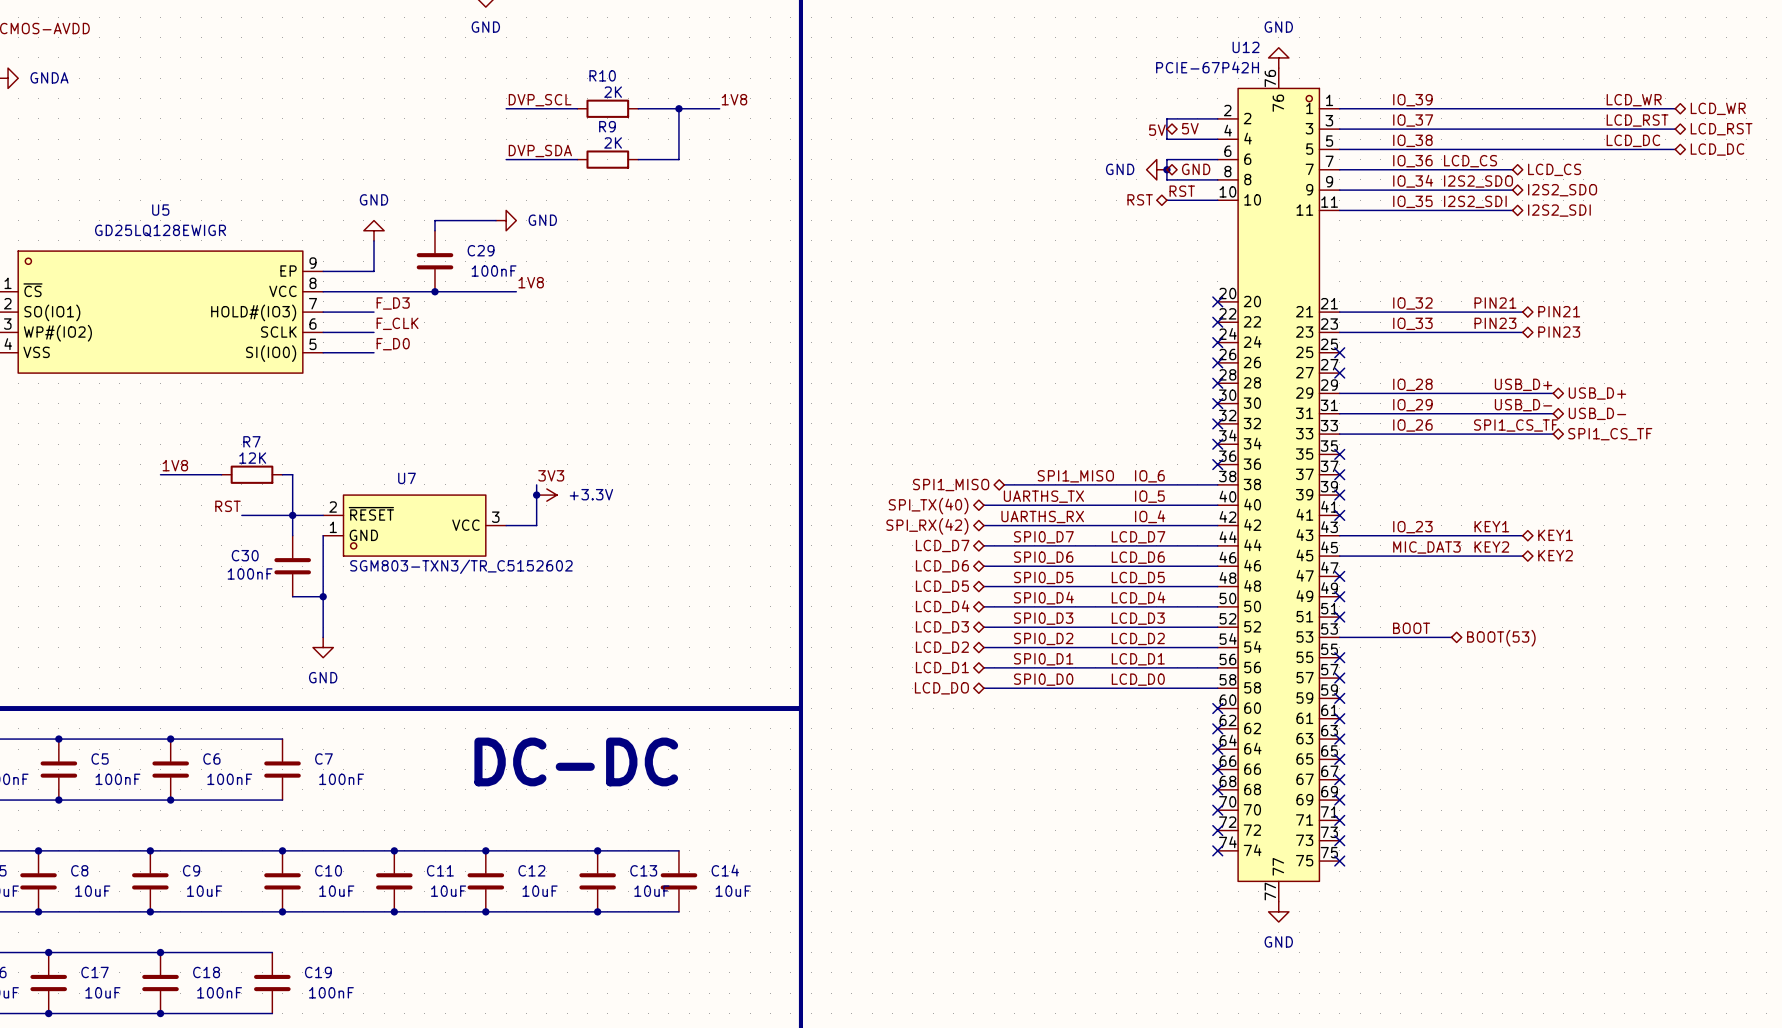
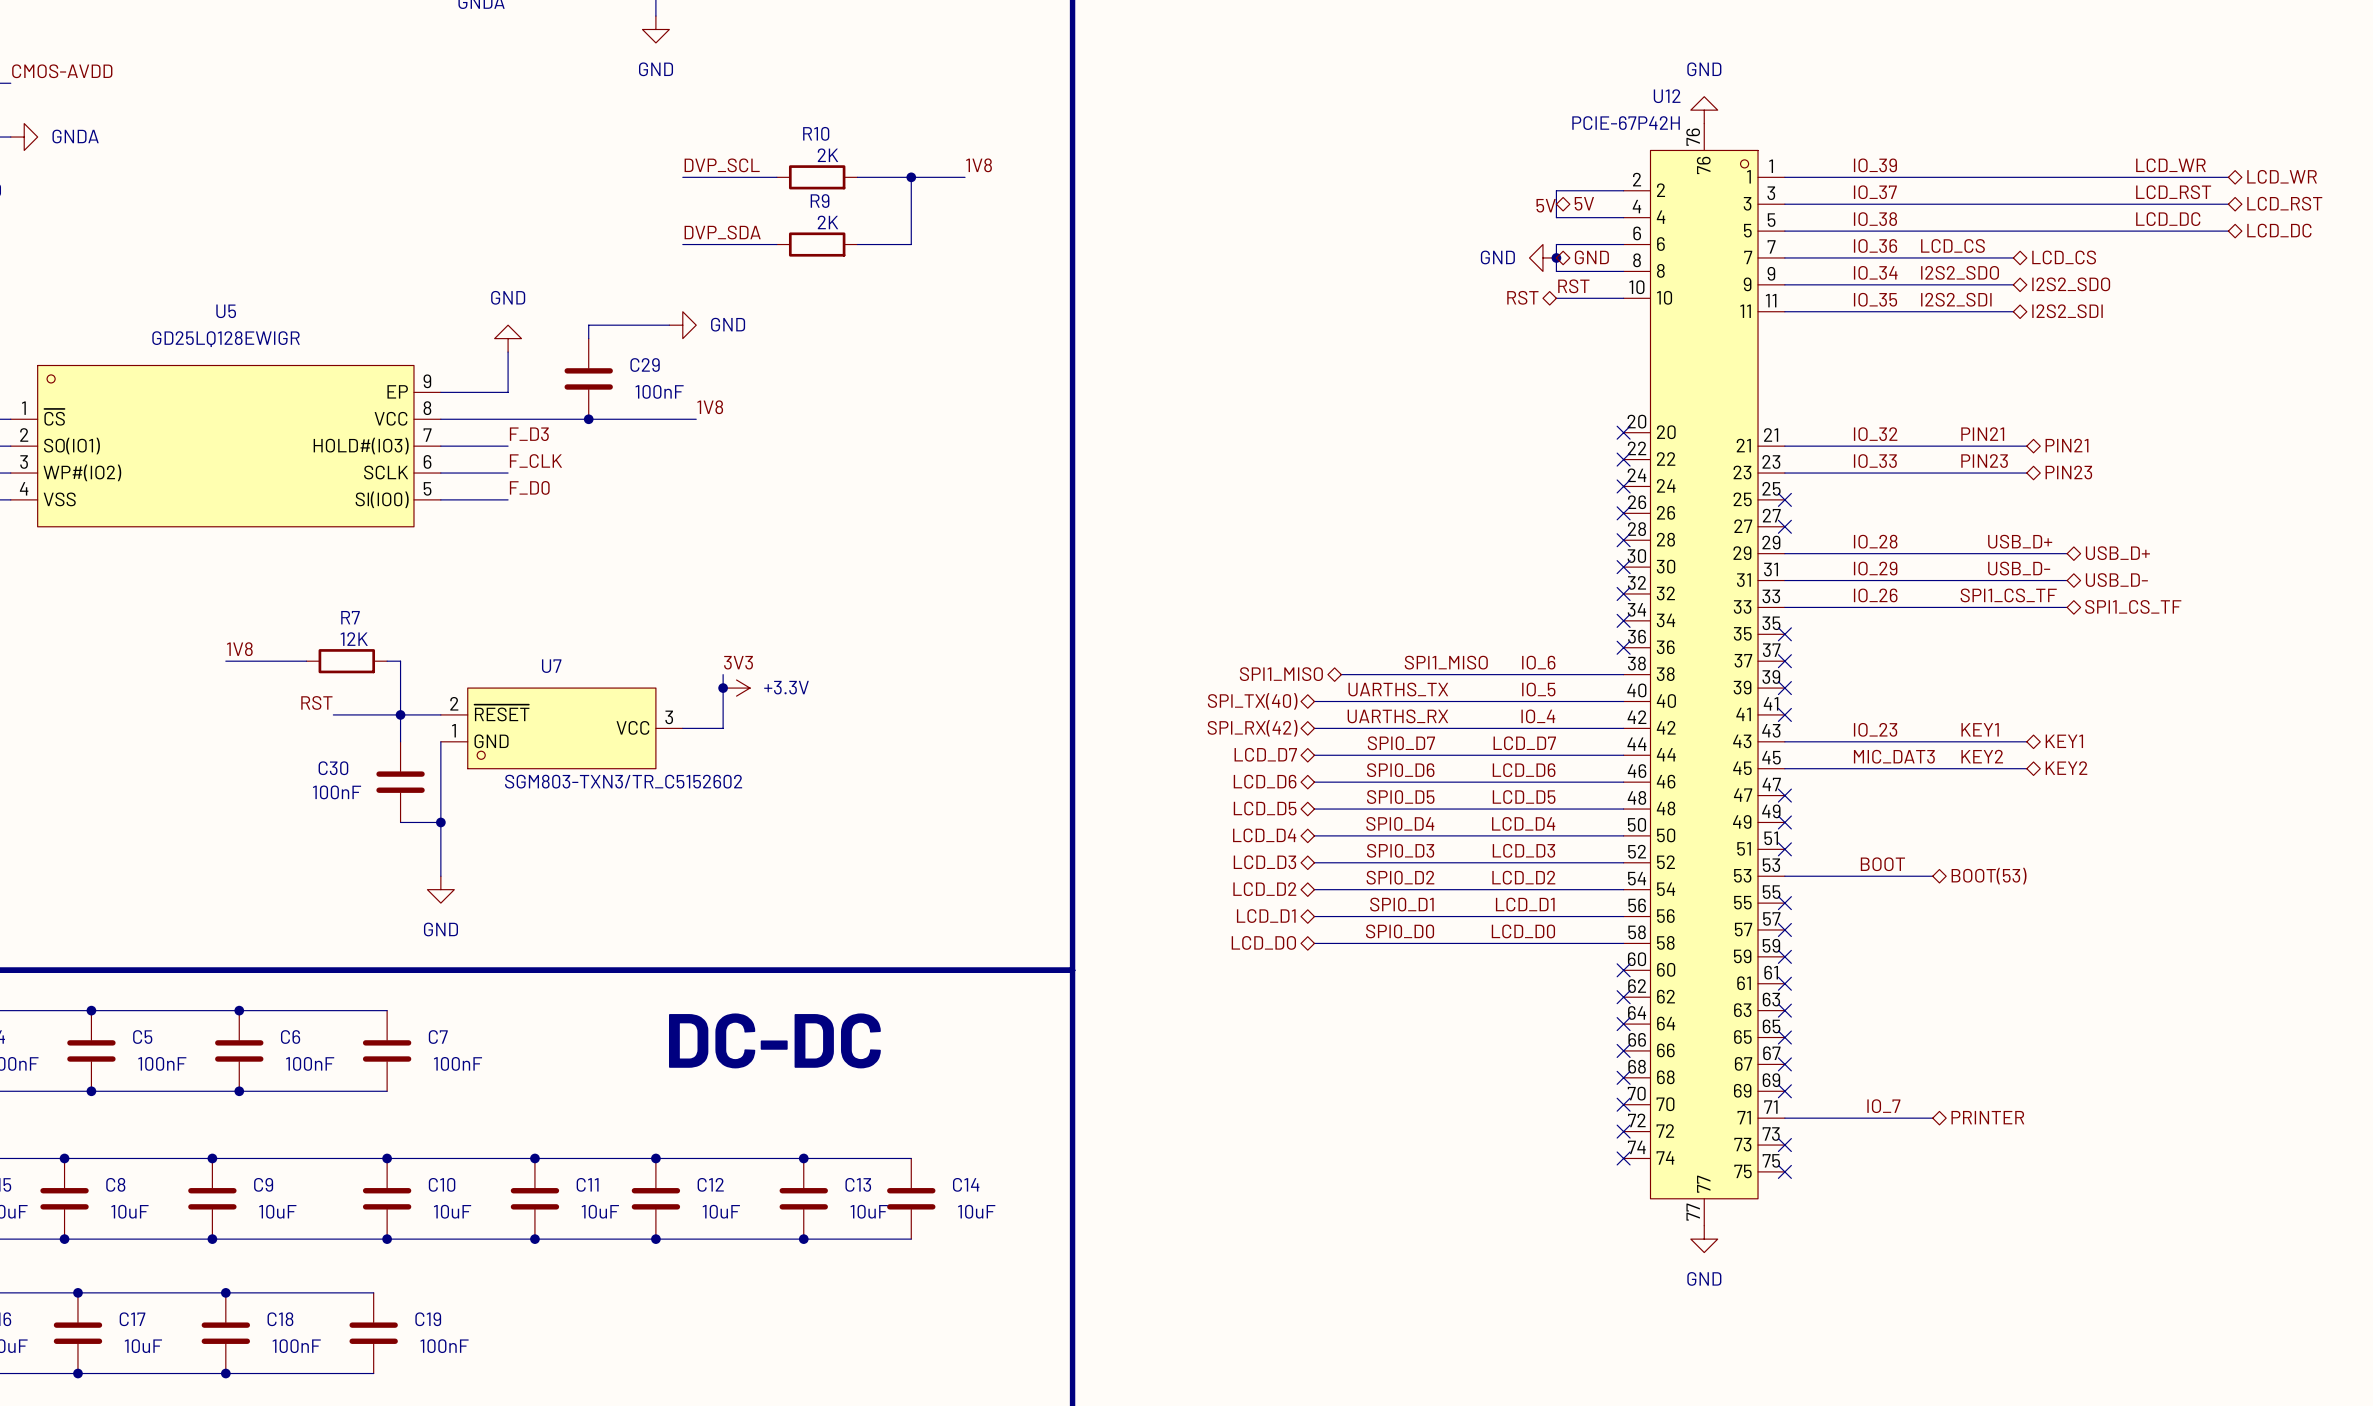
label: none -> IO_7 (1883, 1106)
hierarchical label: none -> PRINTER (1987, 1117)
wire: none -> (1784, 1118) (1932, 1118)
no-connect mark: (1339, 820) -> none

